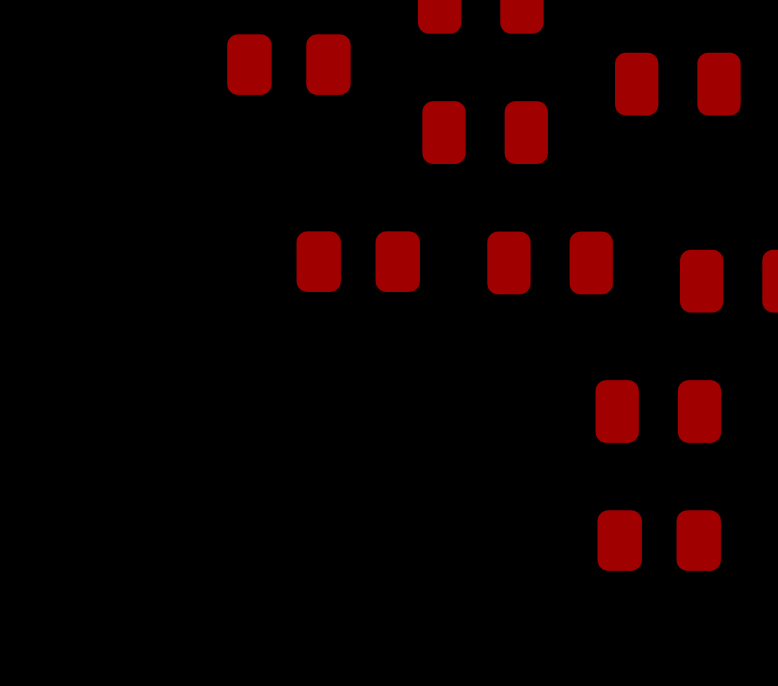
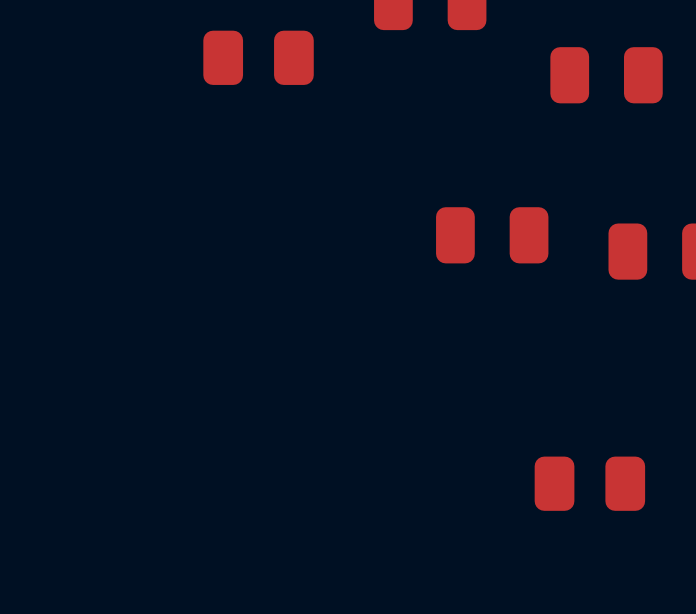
part: (485, 132) -> none
part: (358, 261) -> none
part: (658, 411) -> none

